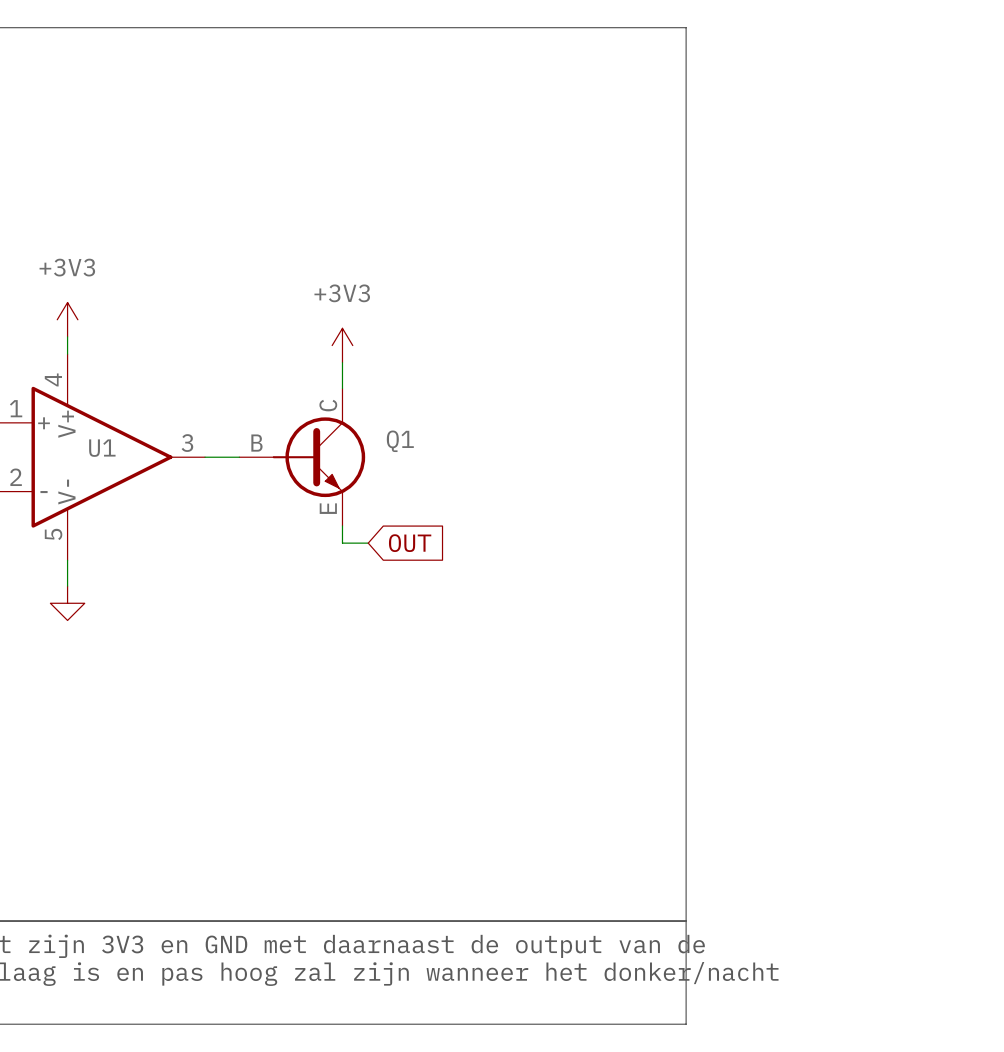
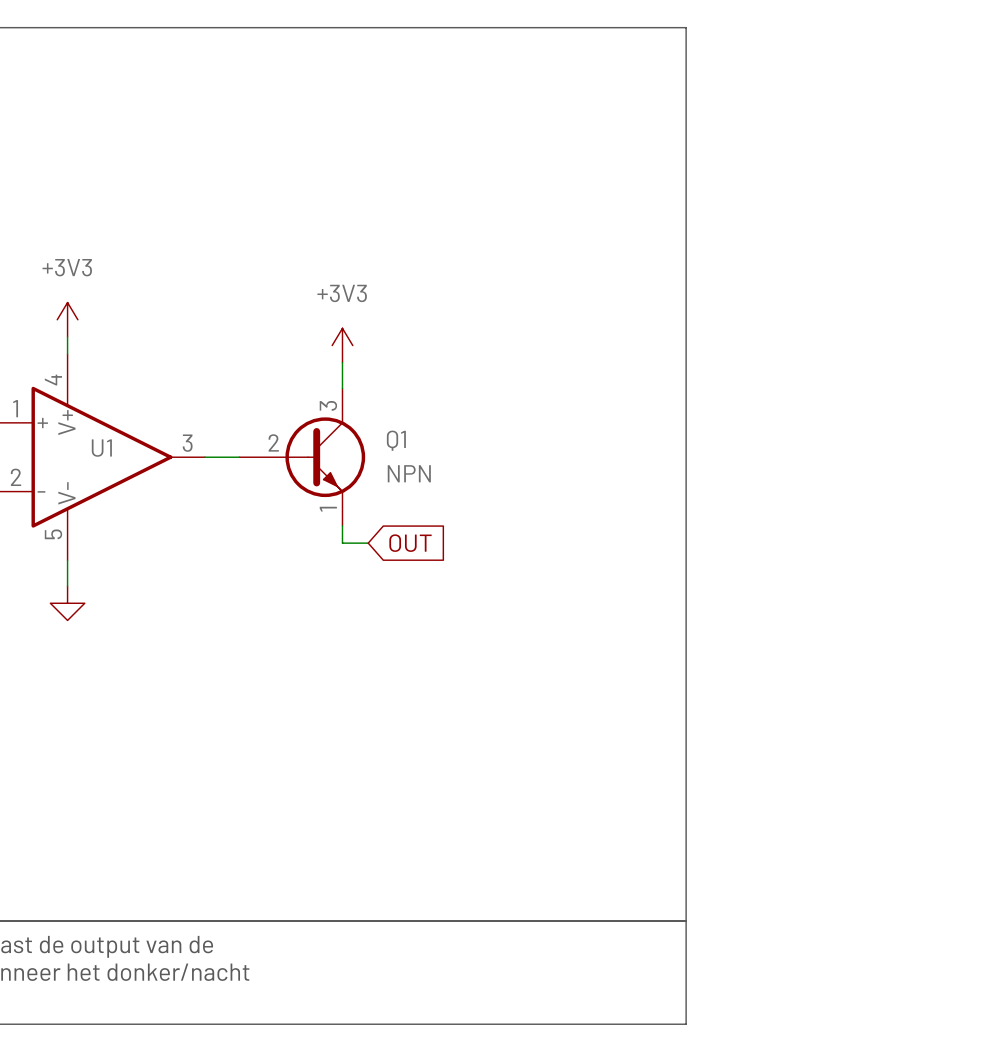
Q1 symbol: [239, 388, 366, 526] -> [239, 388, 366, 526]
Q1 value: none -> NPN (409, 473)

